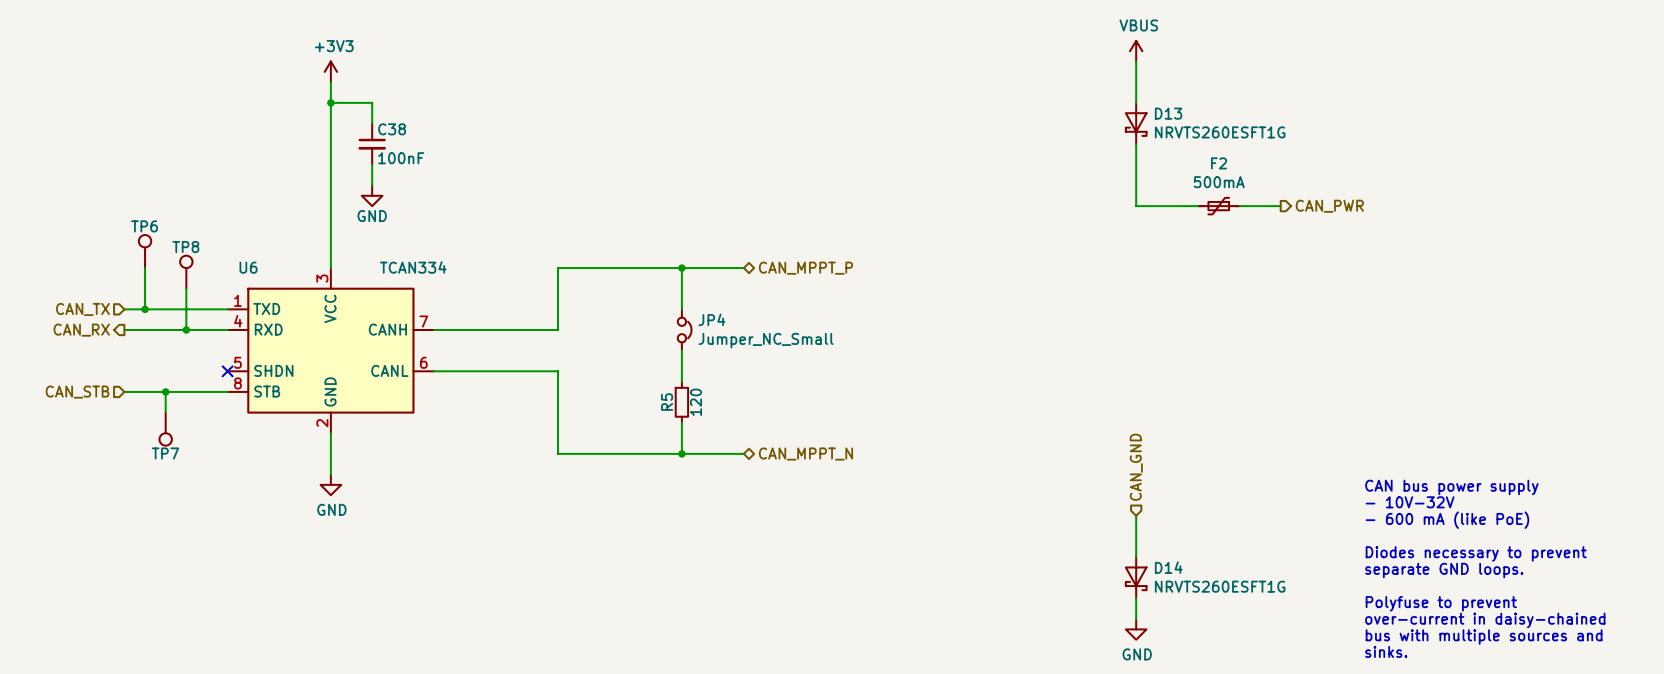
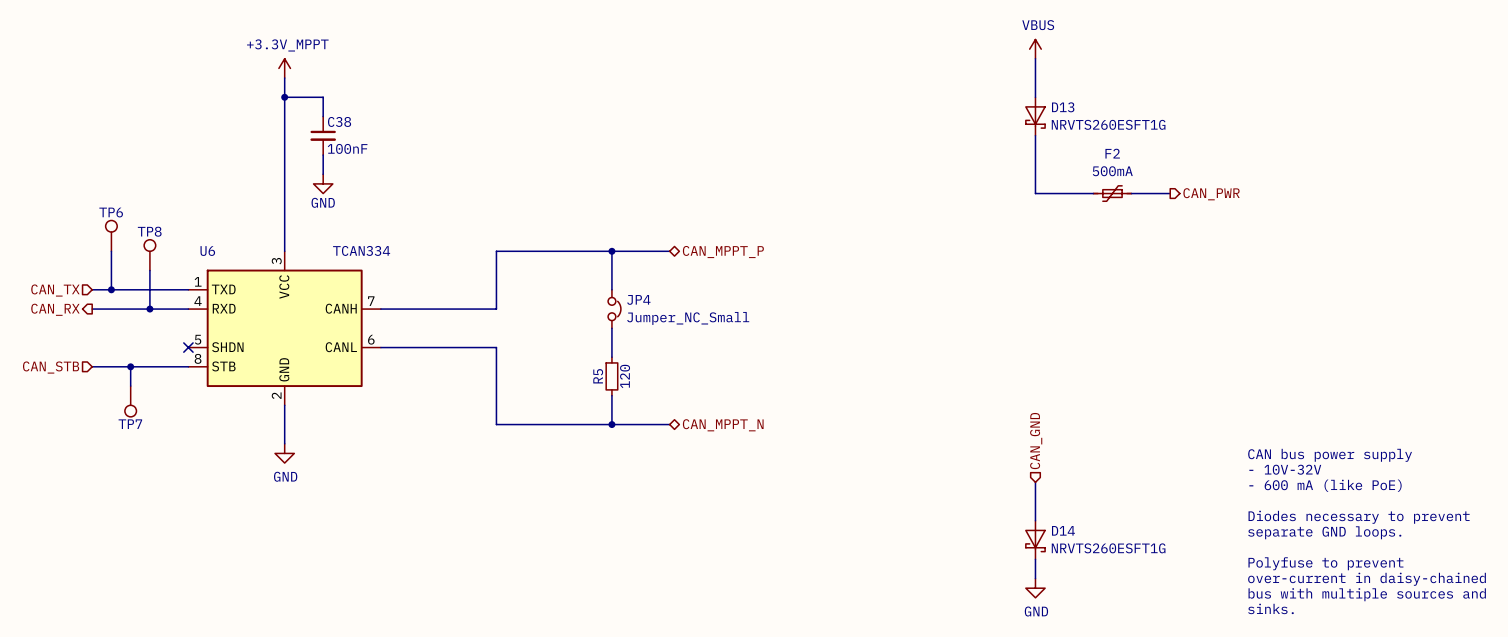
power symbol: +3V3 (330, 71) -> +3.3V_MPPT (284, 68)

